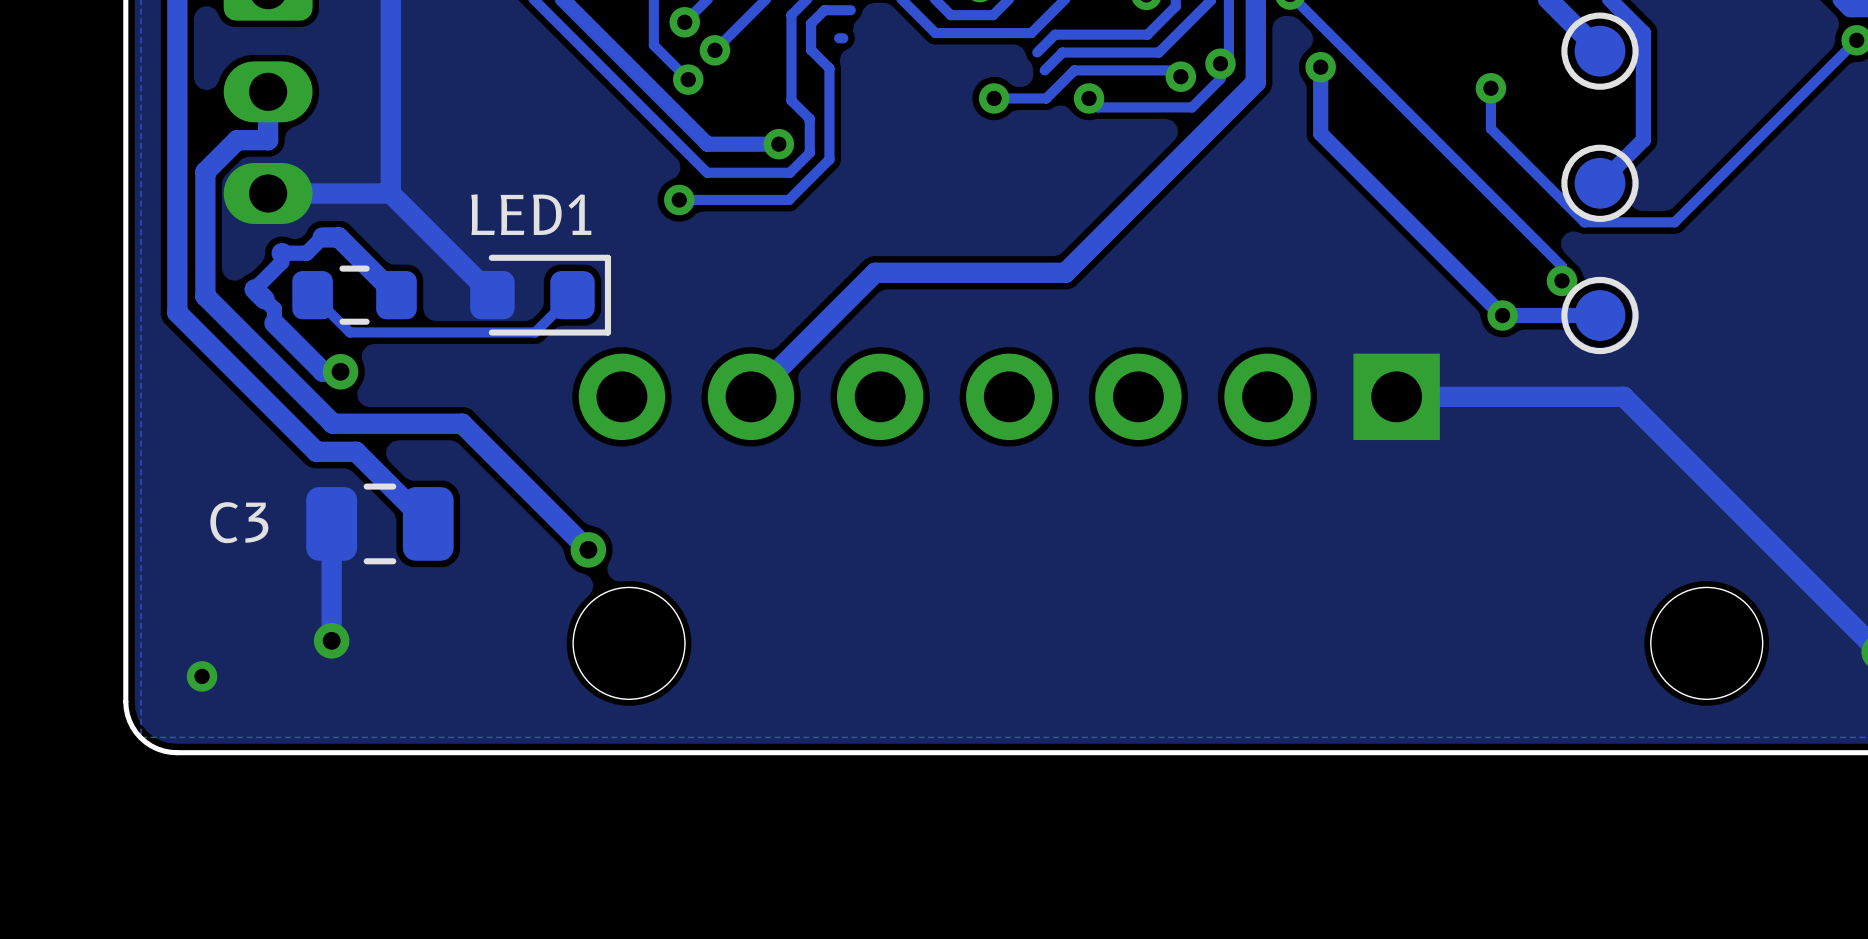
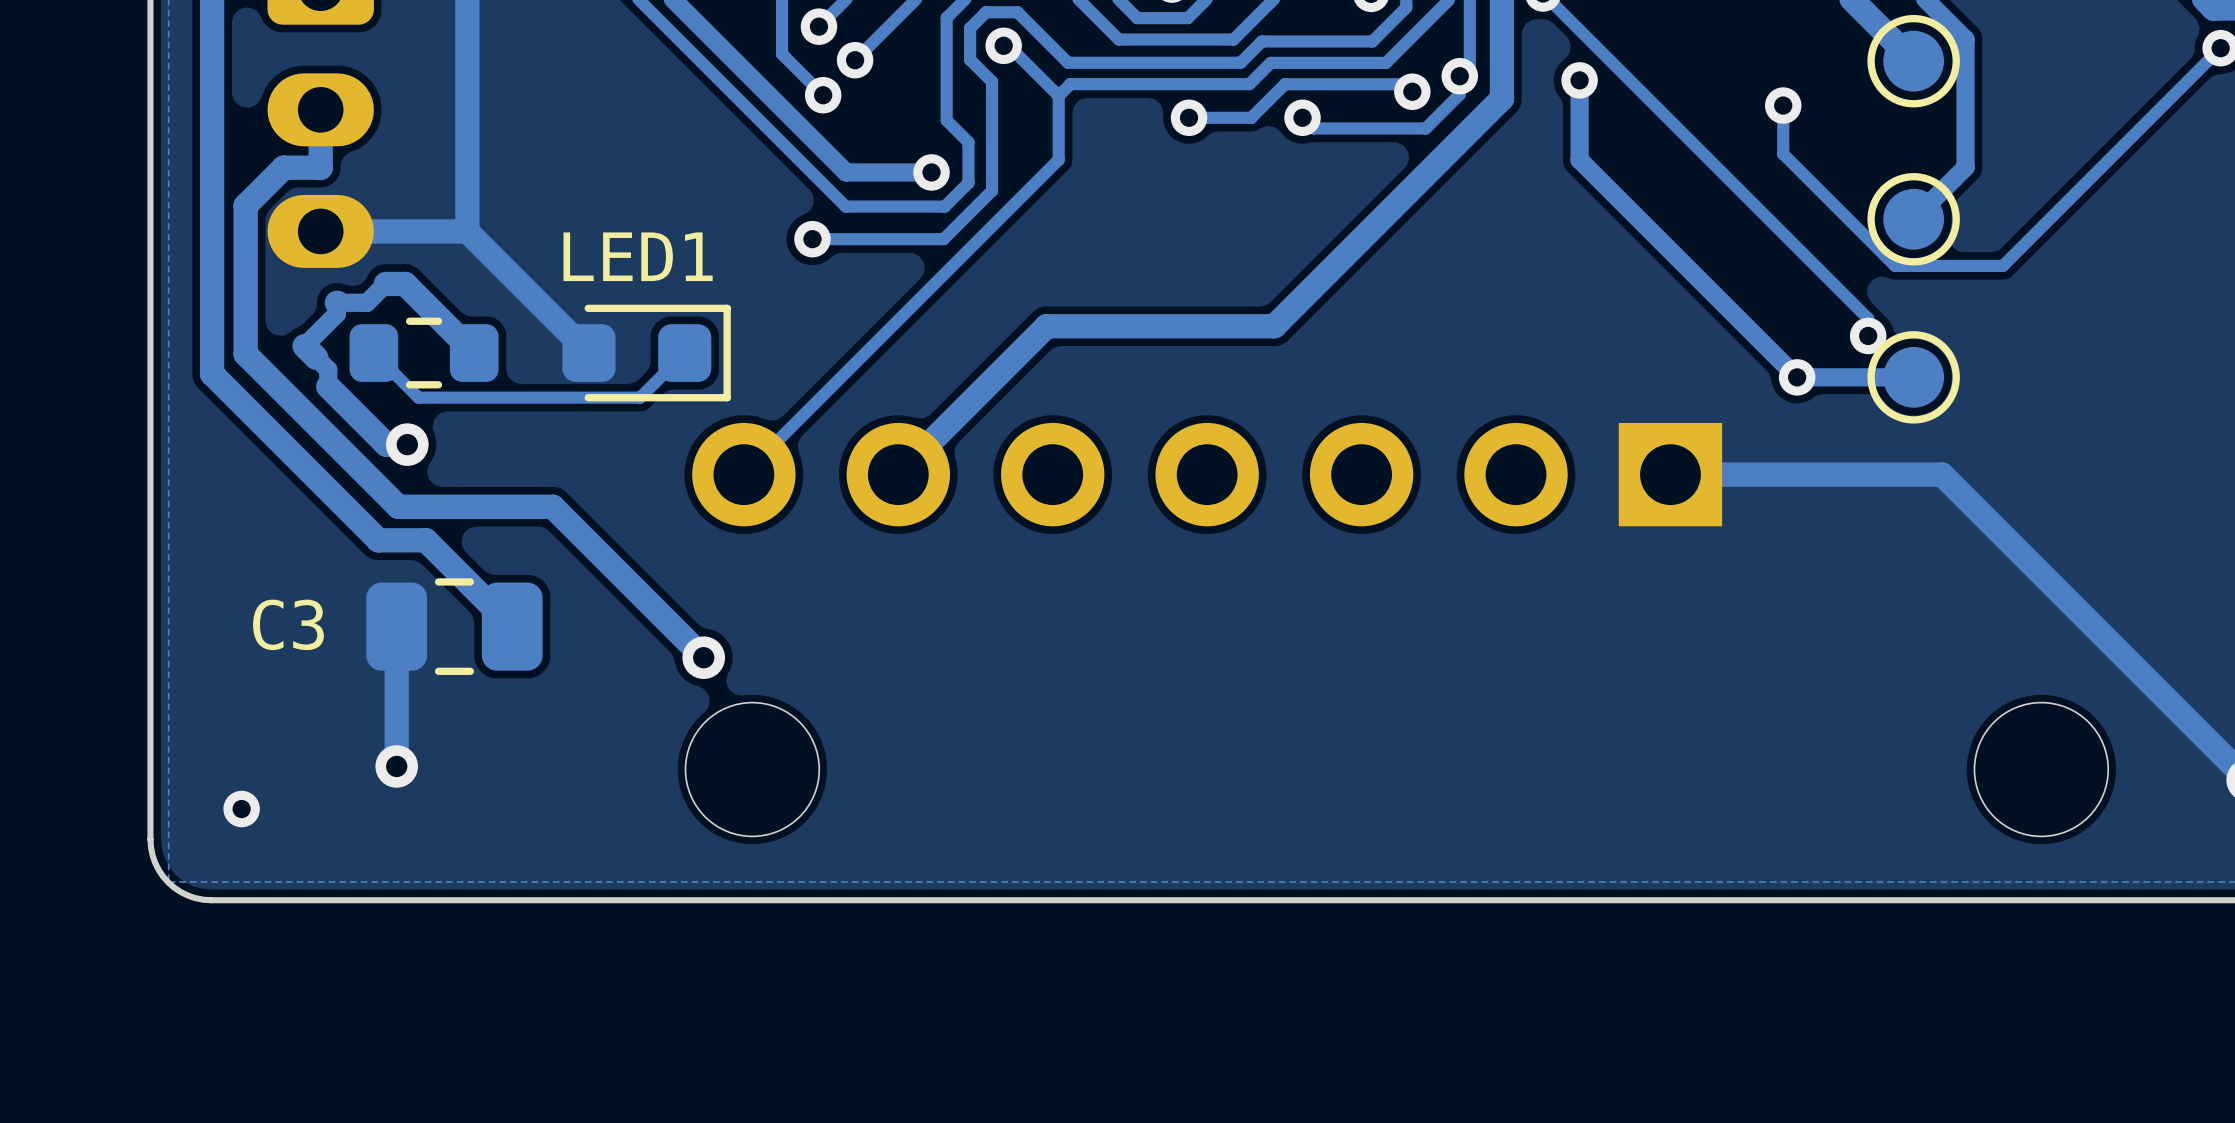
track: none -> (1017, 12) (1068, 62) (1240, 62)
via: none -> (1003, 45)
track: none -> (1008, 45) (1058, 95)
track: none -> (1249, 84) (1070, 84) (1058, 95)
track: none -> (1058, 95) (1058, 159) (743, 474)

